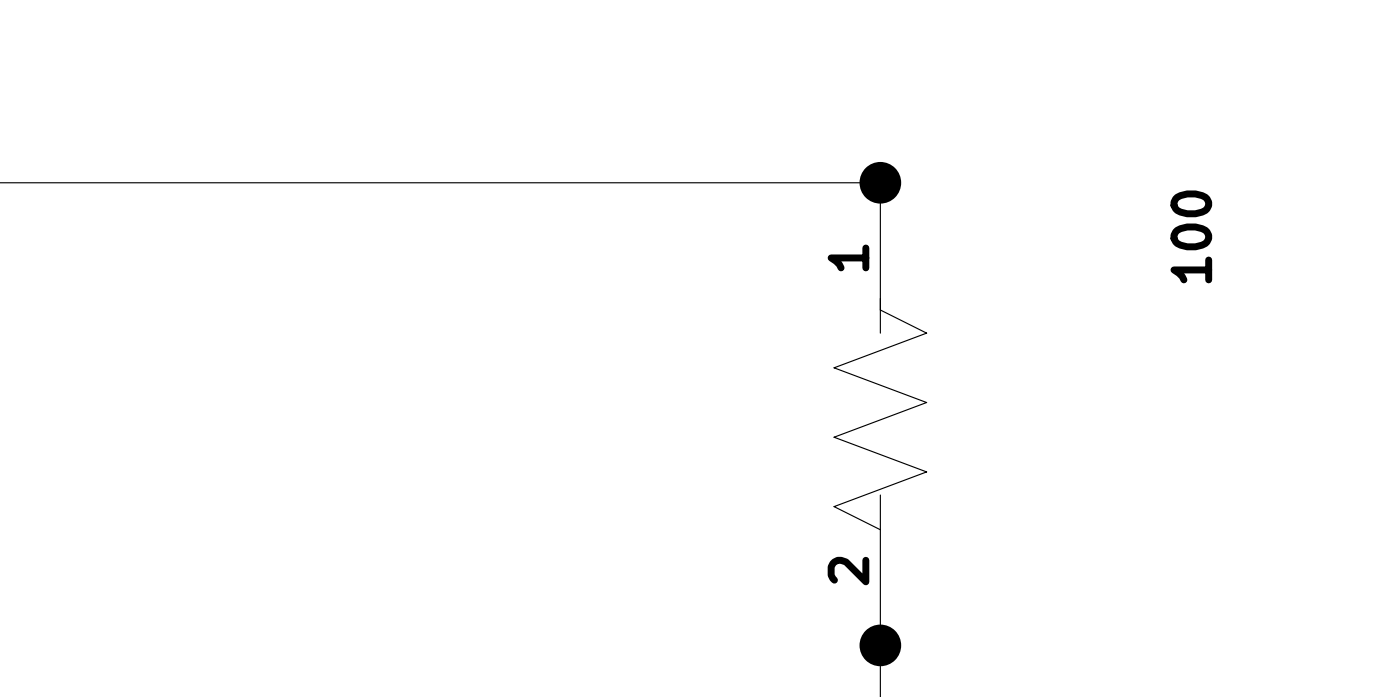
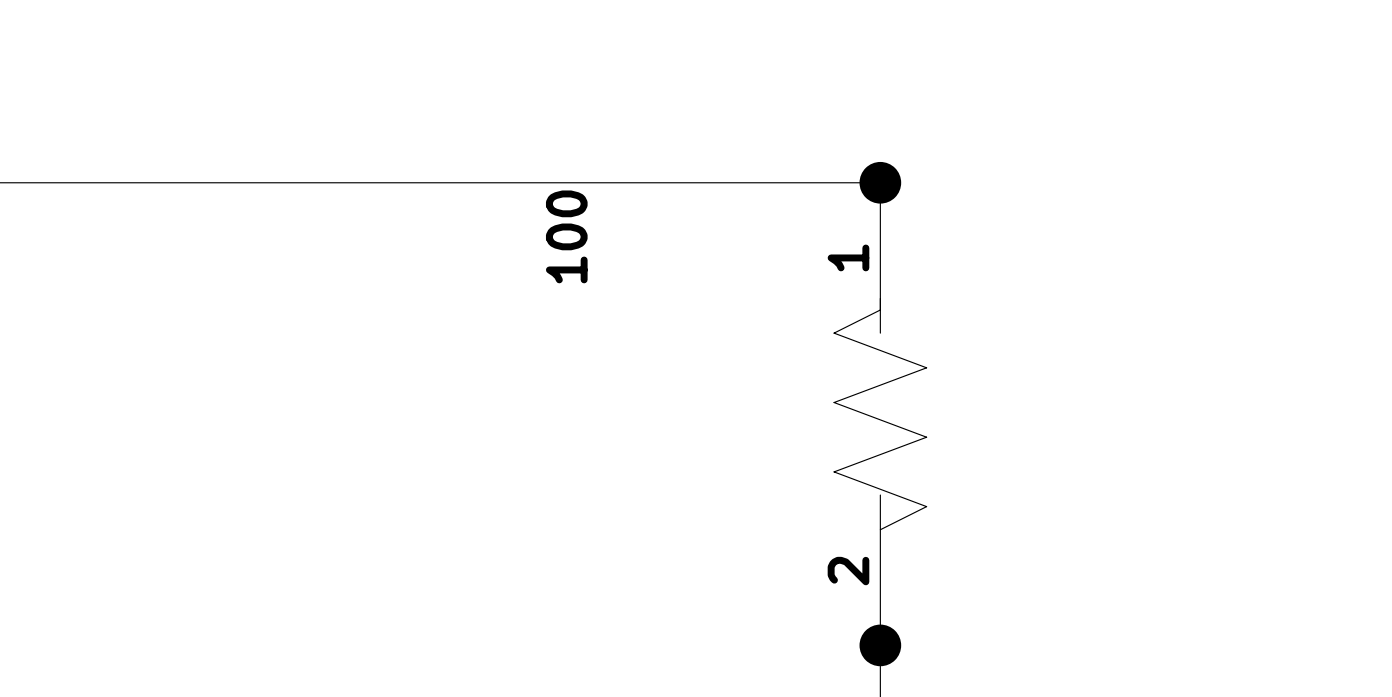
part flip: as is (880, 414) -> left-right (880, 414)

